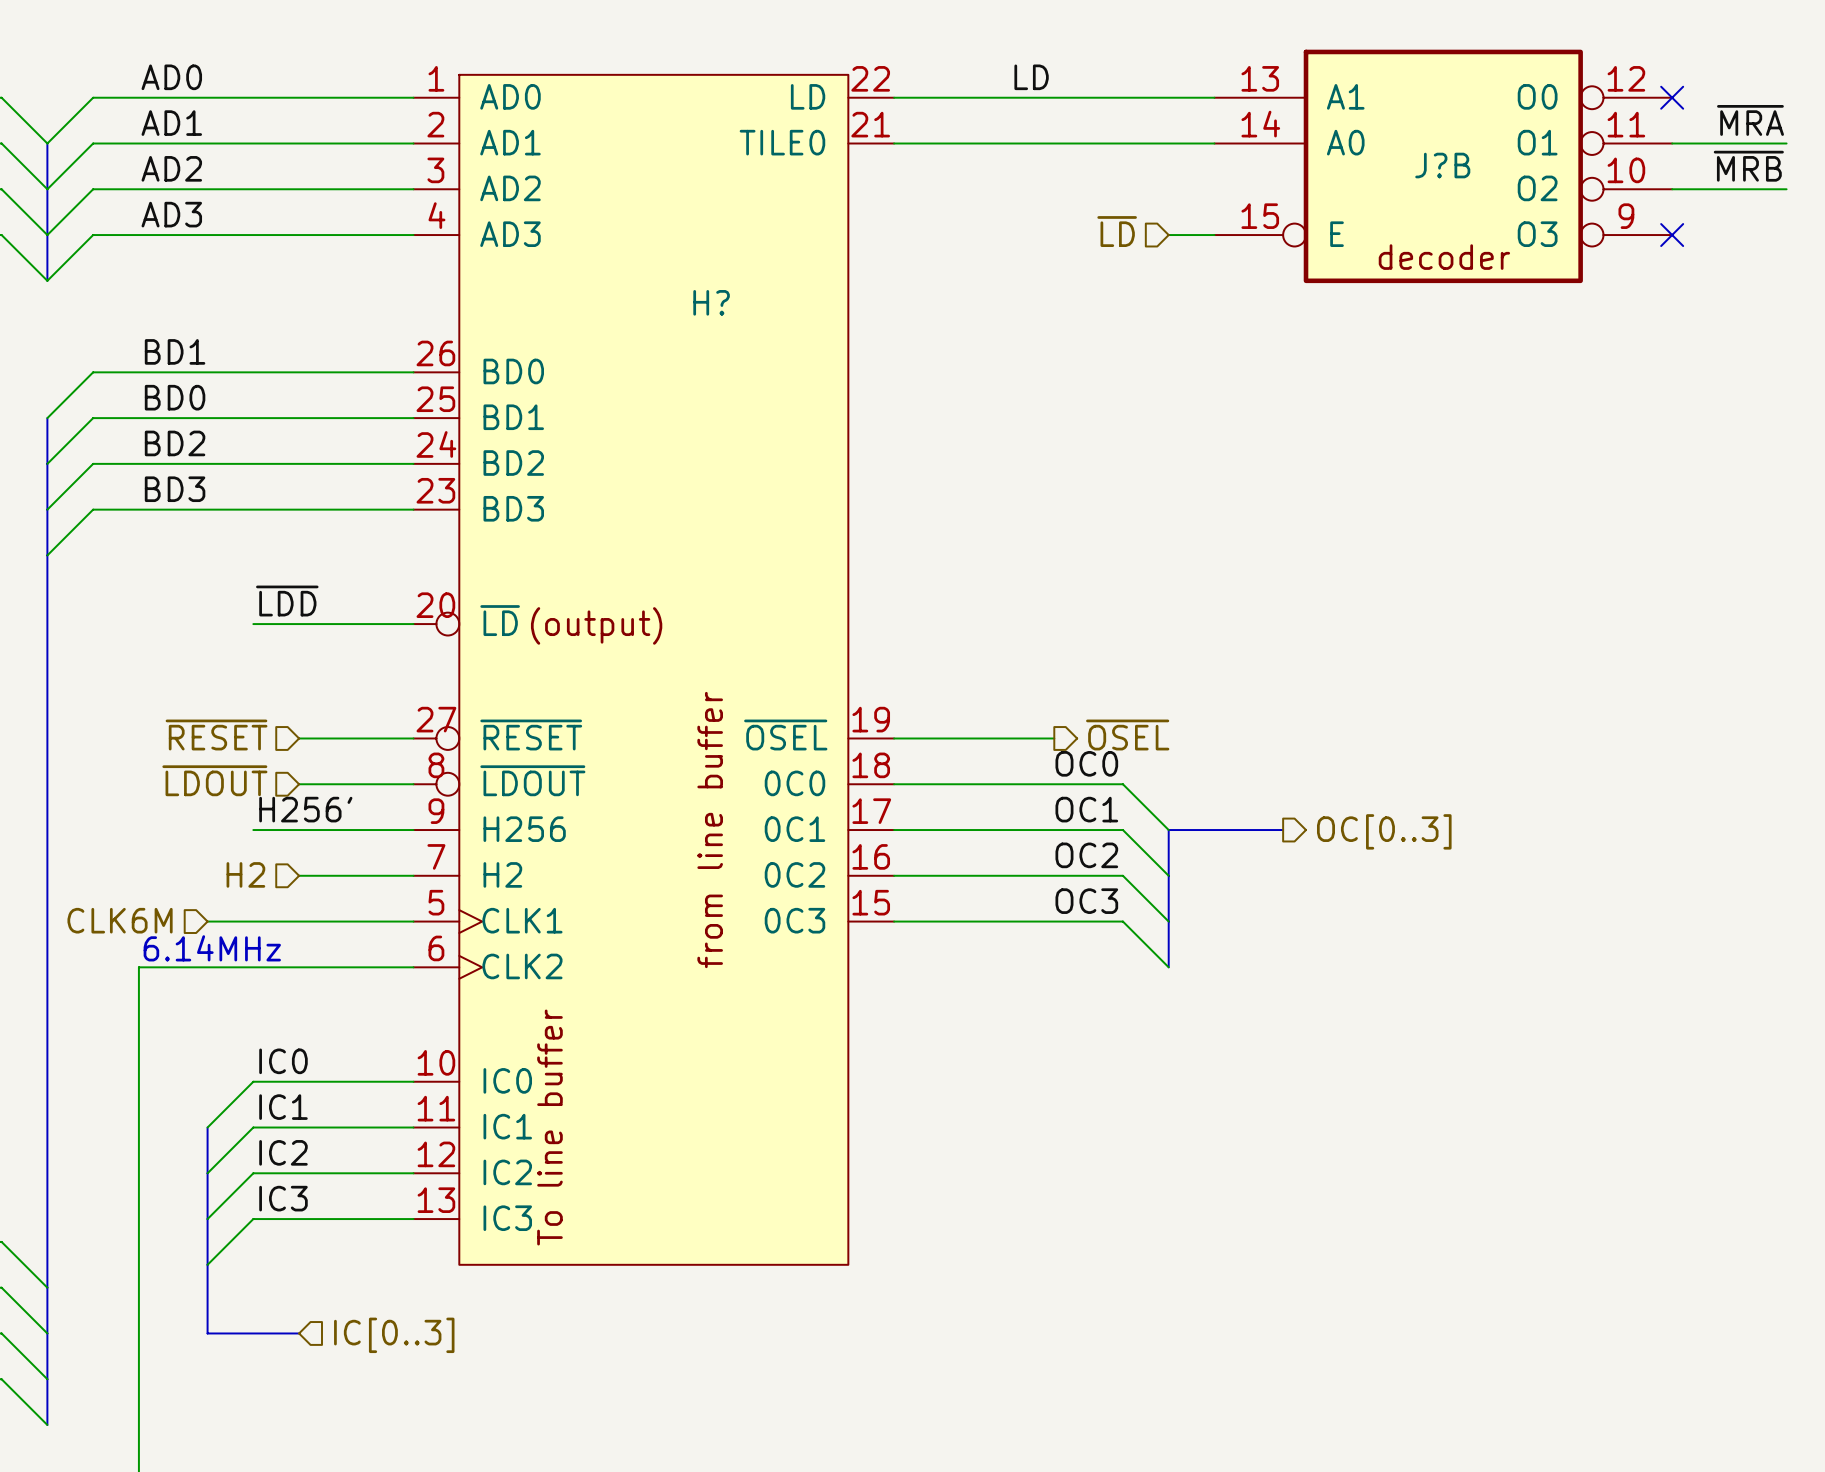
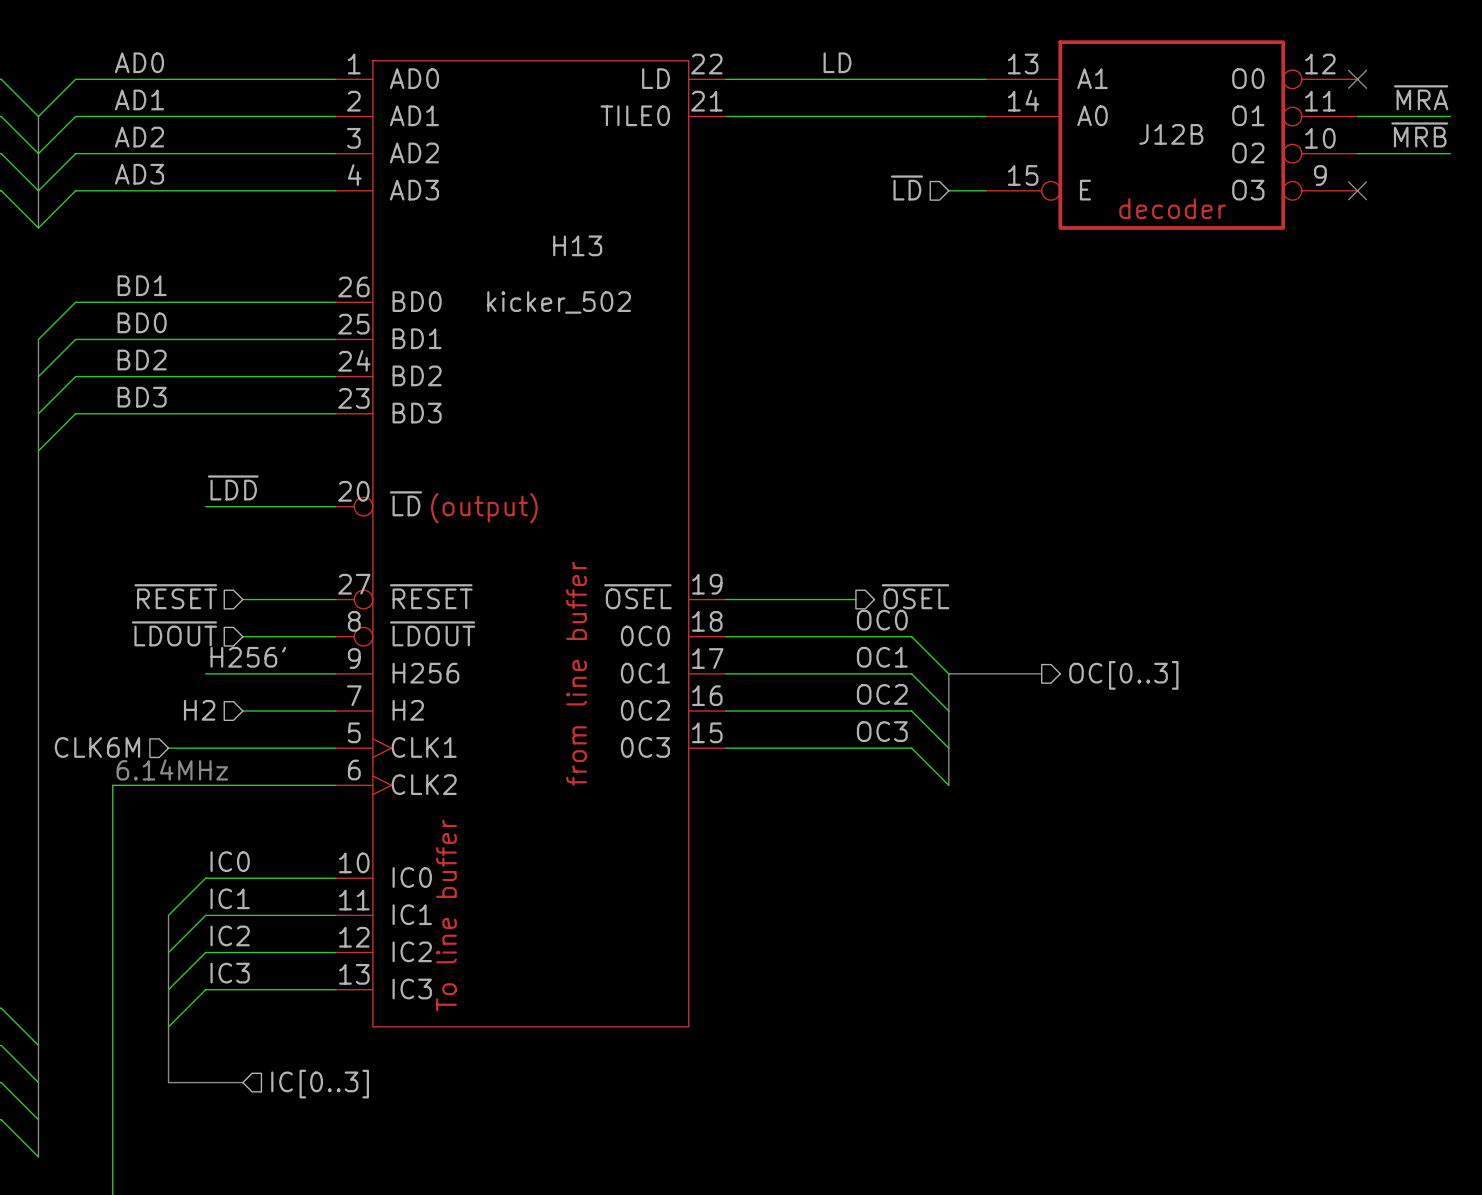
J?B name: J?B (1442, 165) -> J12B (1171, 134)
H? name: H? (711, 302) -> H13 (577, 245)
H? value: none -> kicker_502 (559, 302)

